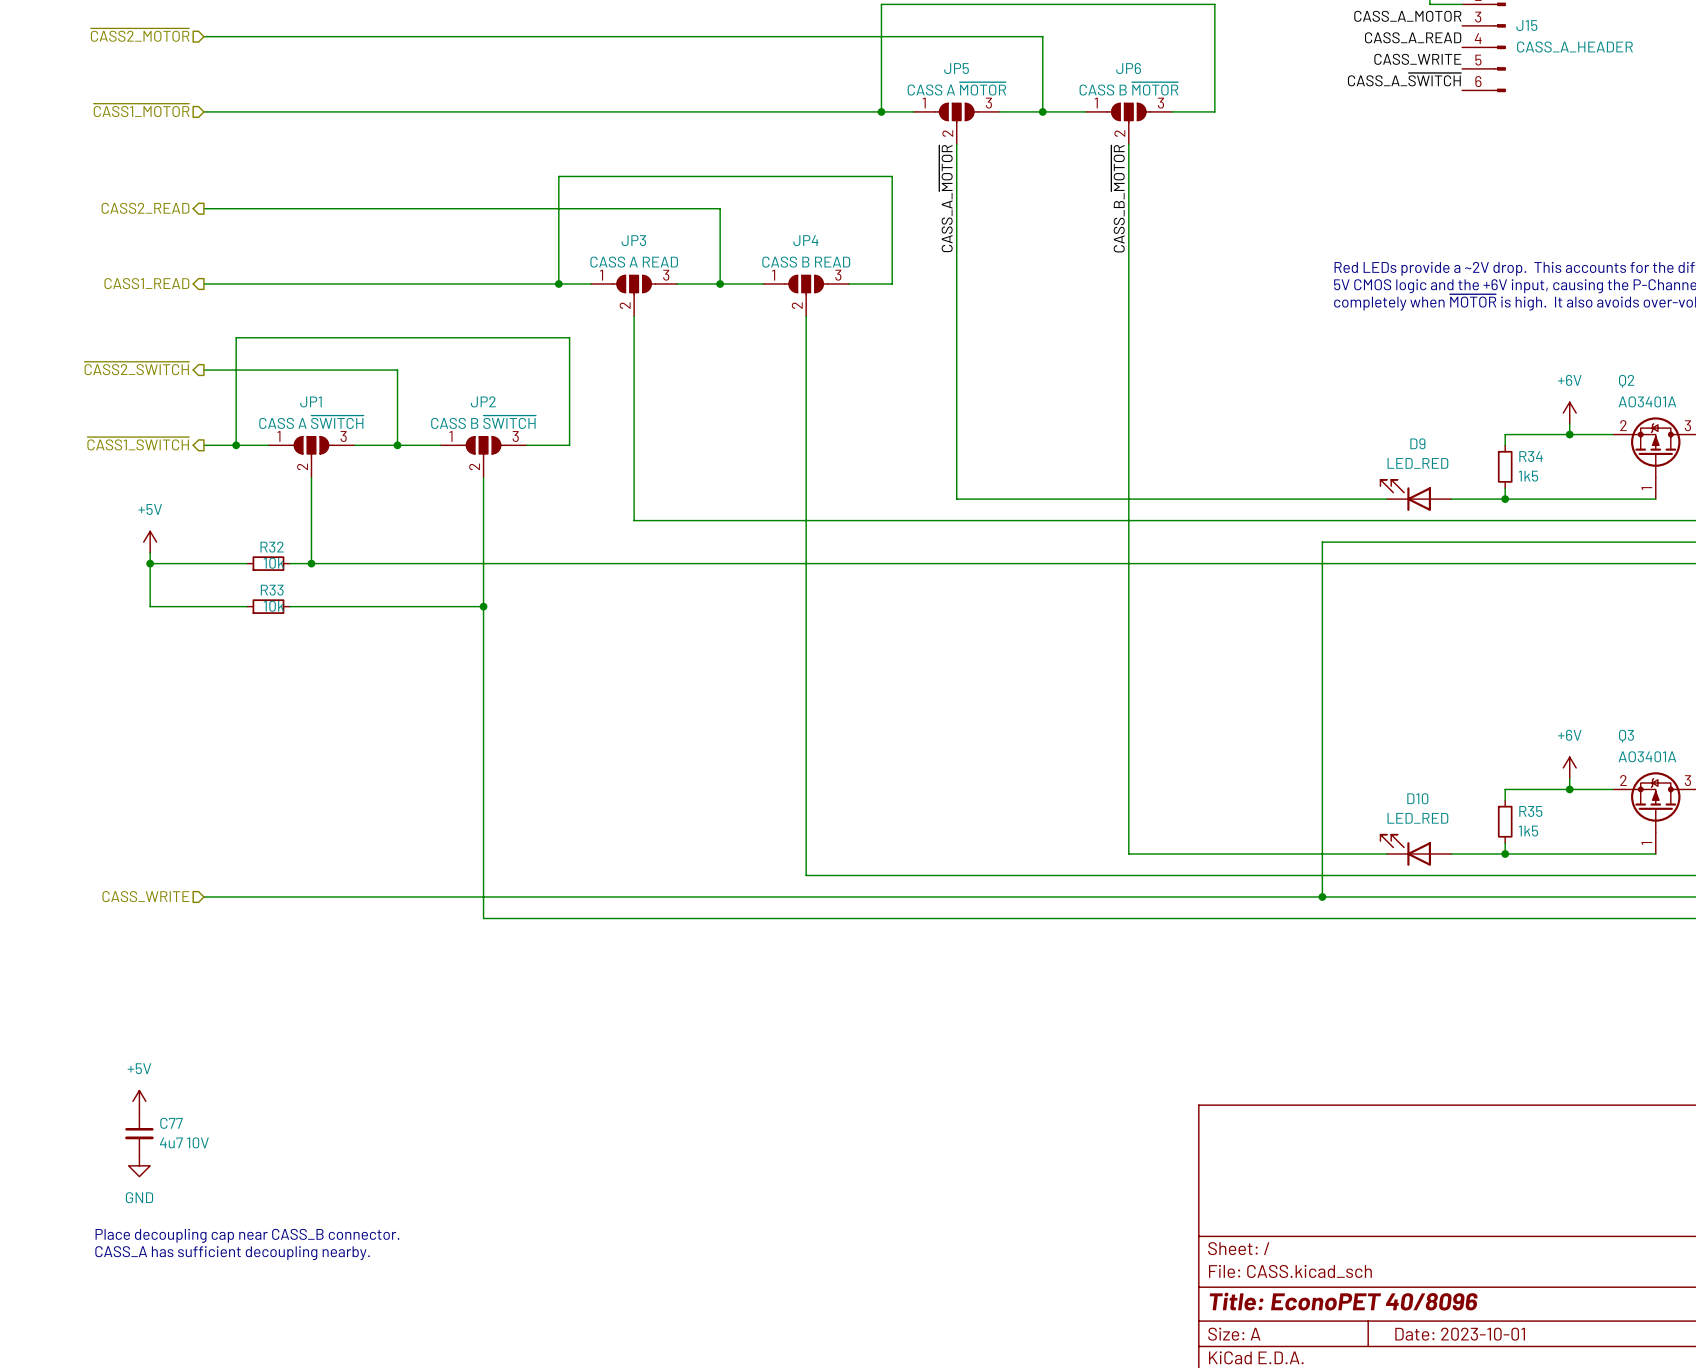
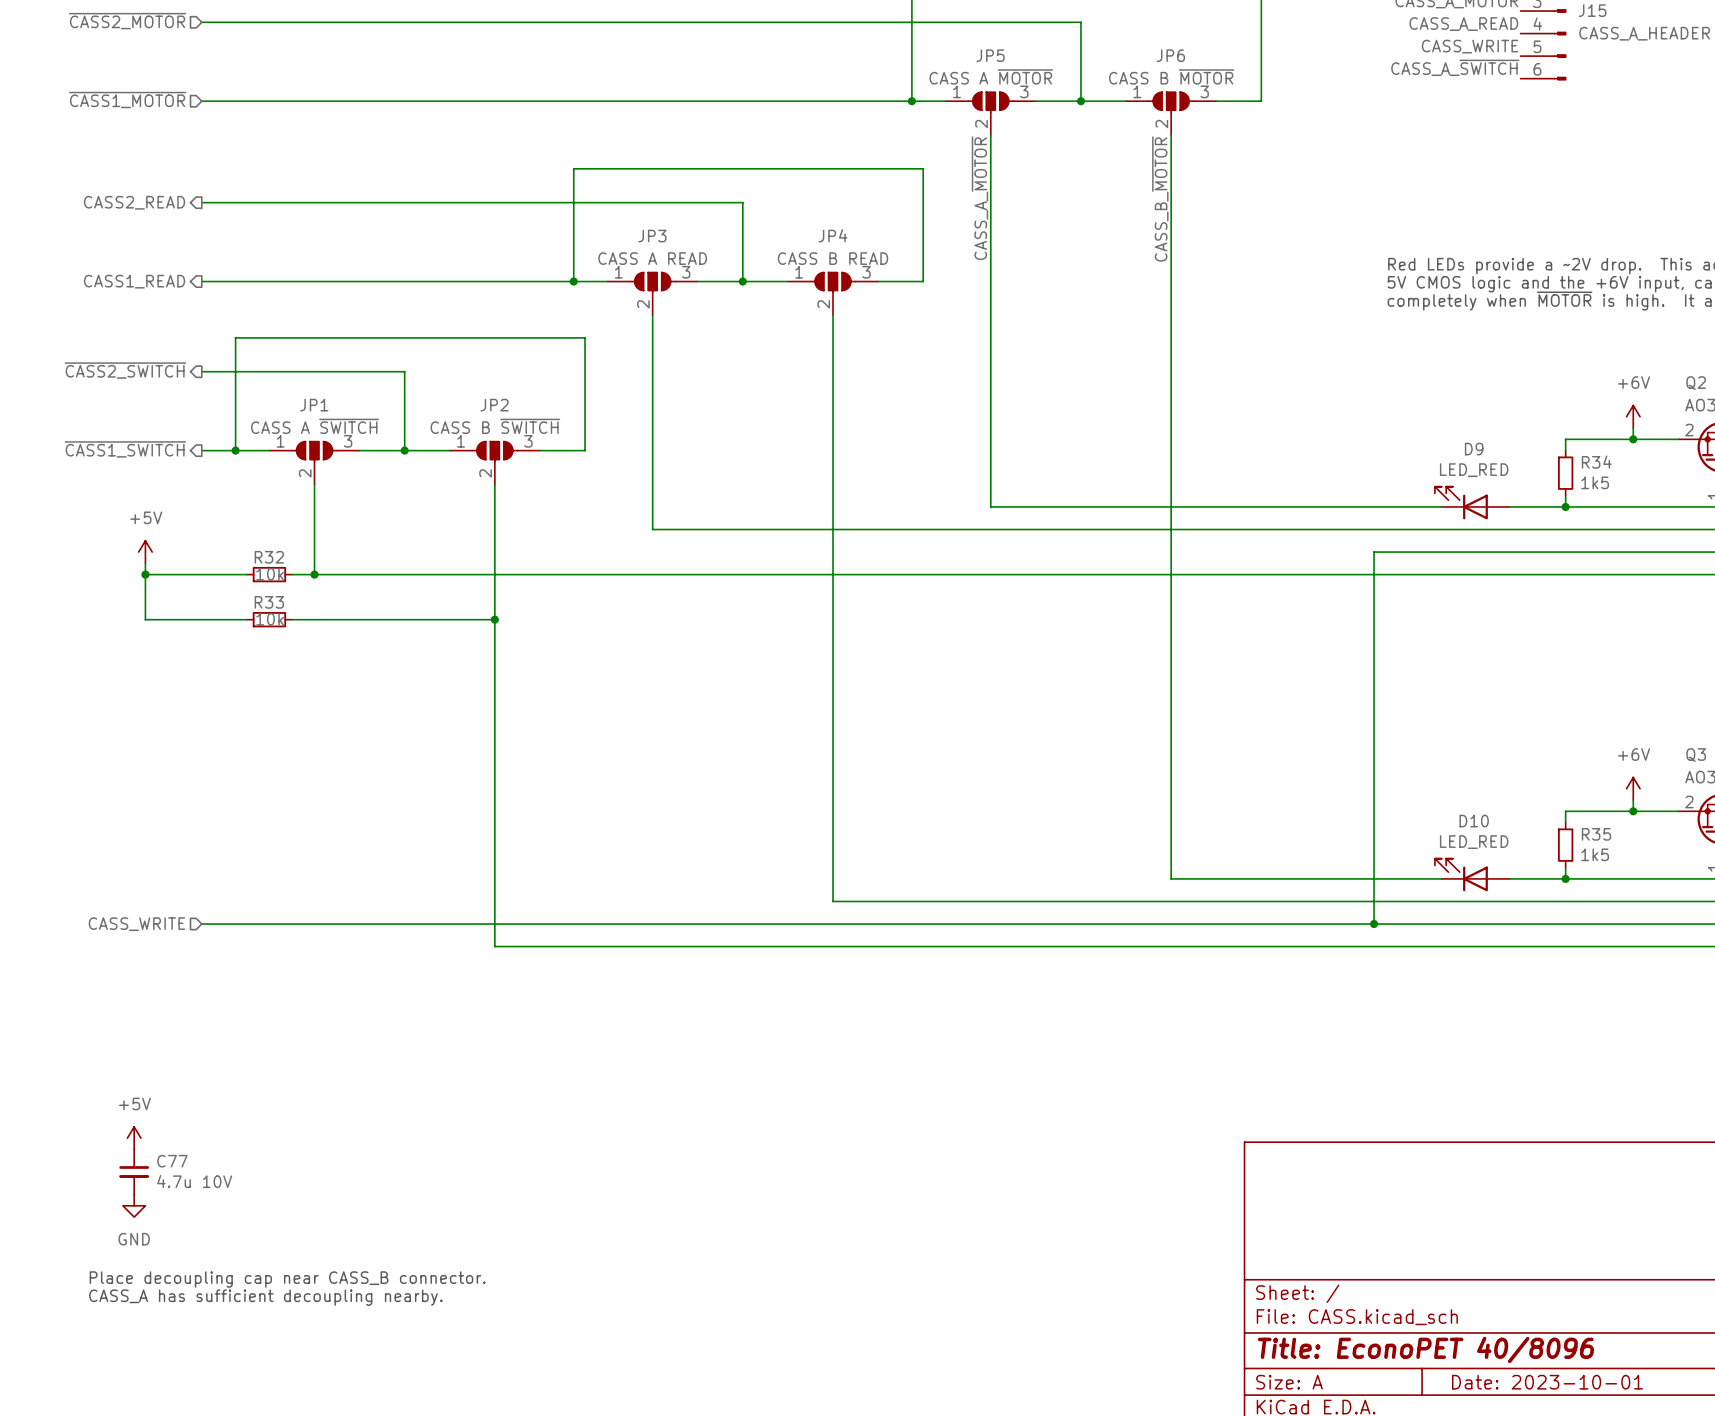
C77 value: 4u7 10V (184, 1142) -> 4.7u 10V (194, 1181)

